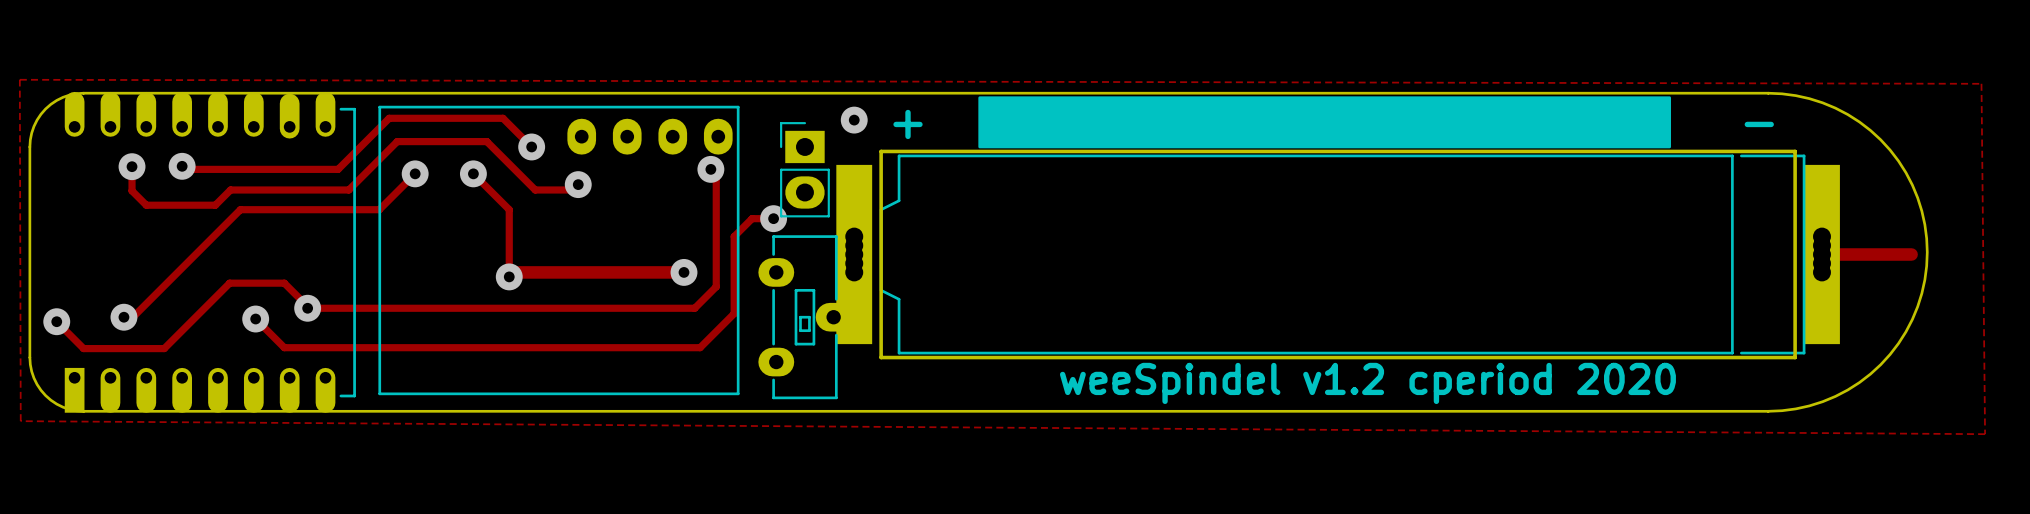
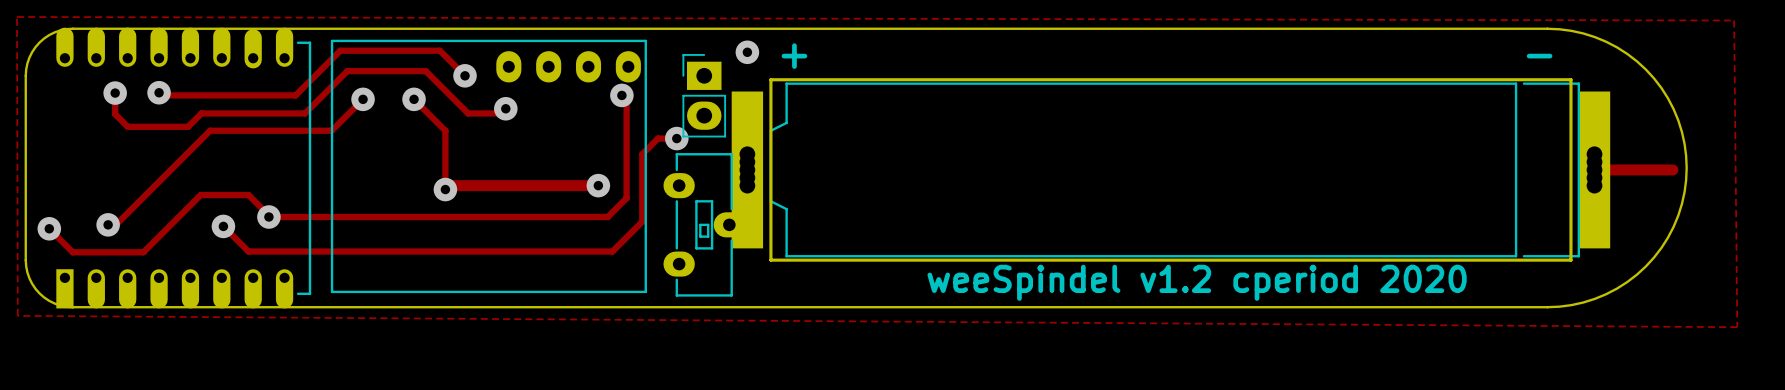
drawing: [978, 96, 1672, 149] -> none

